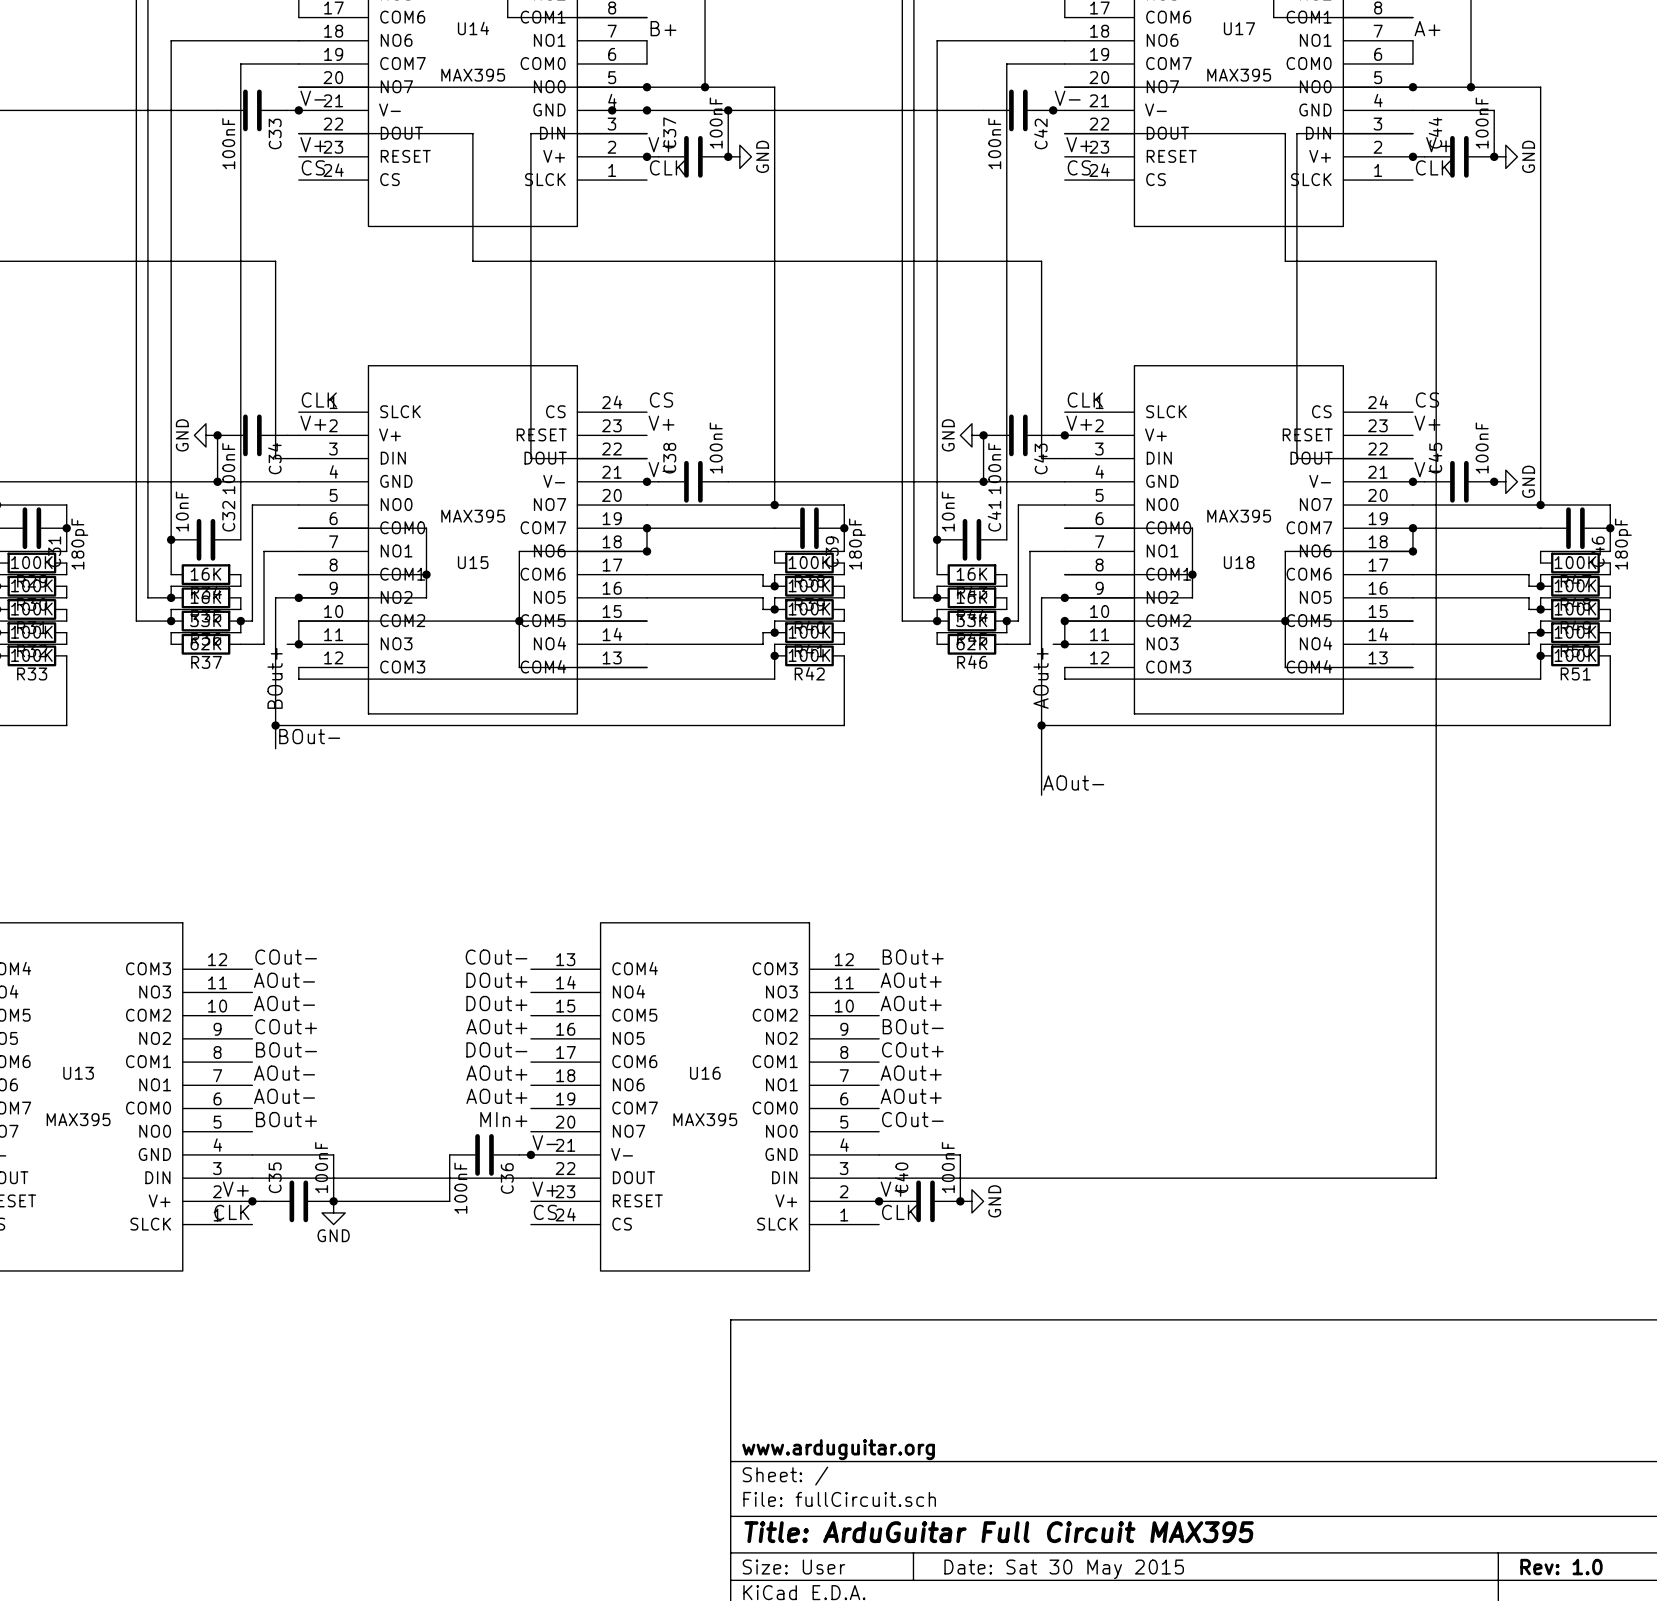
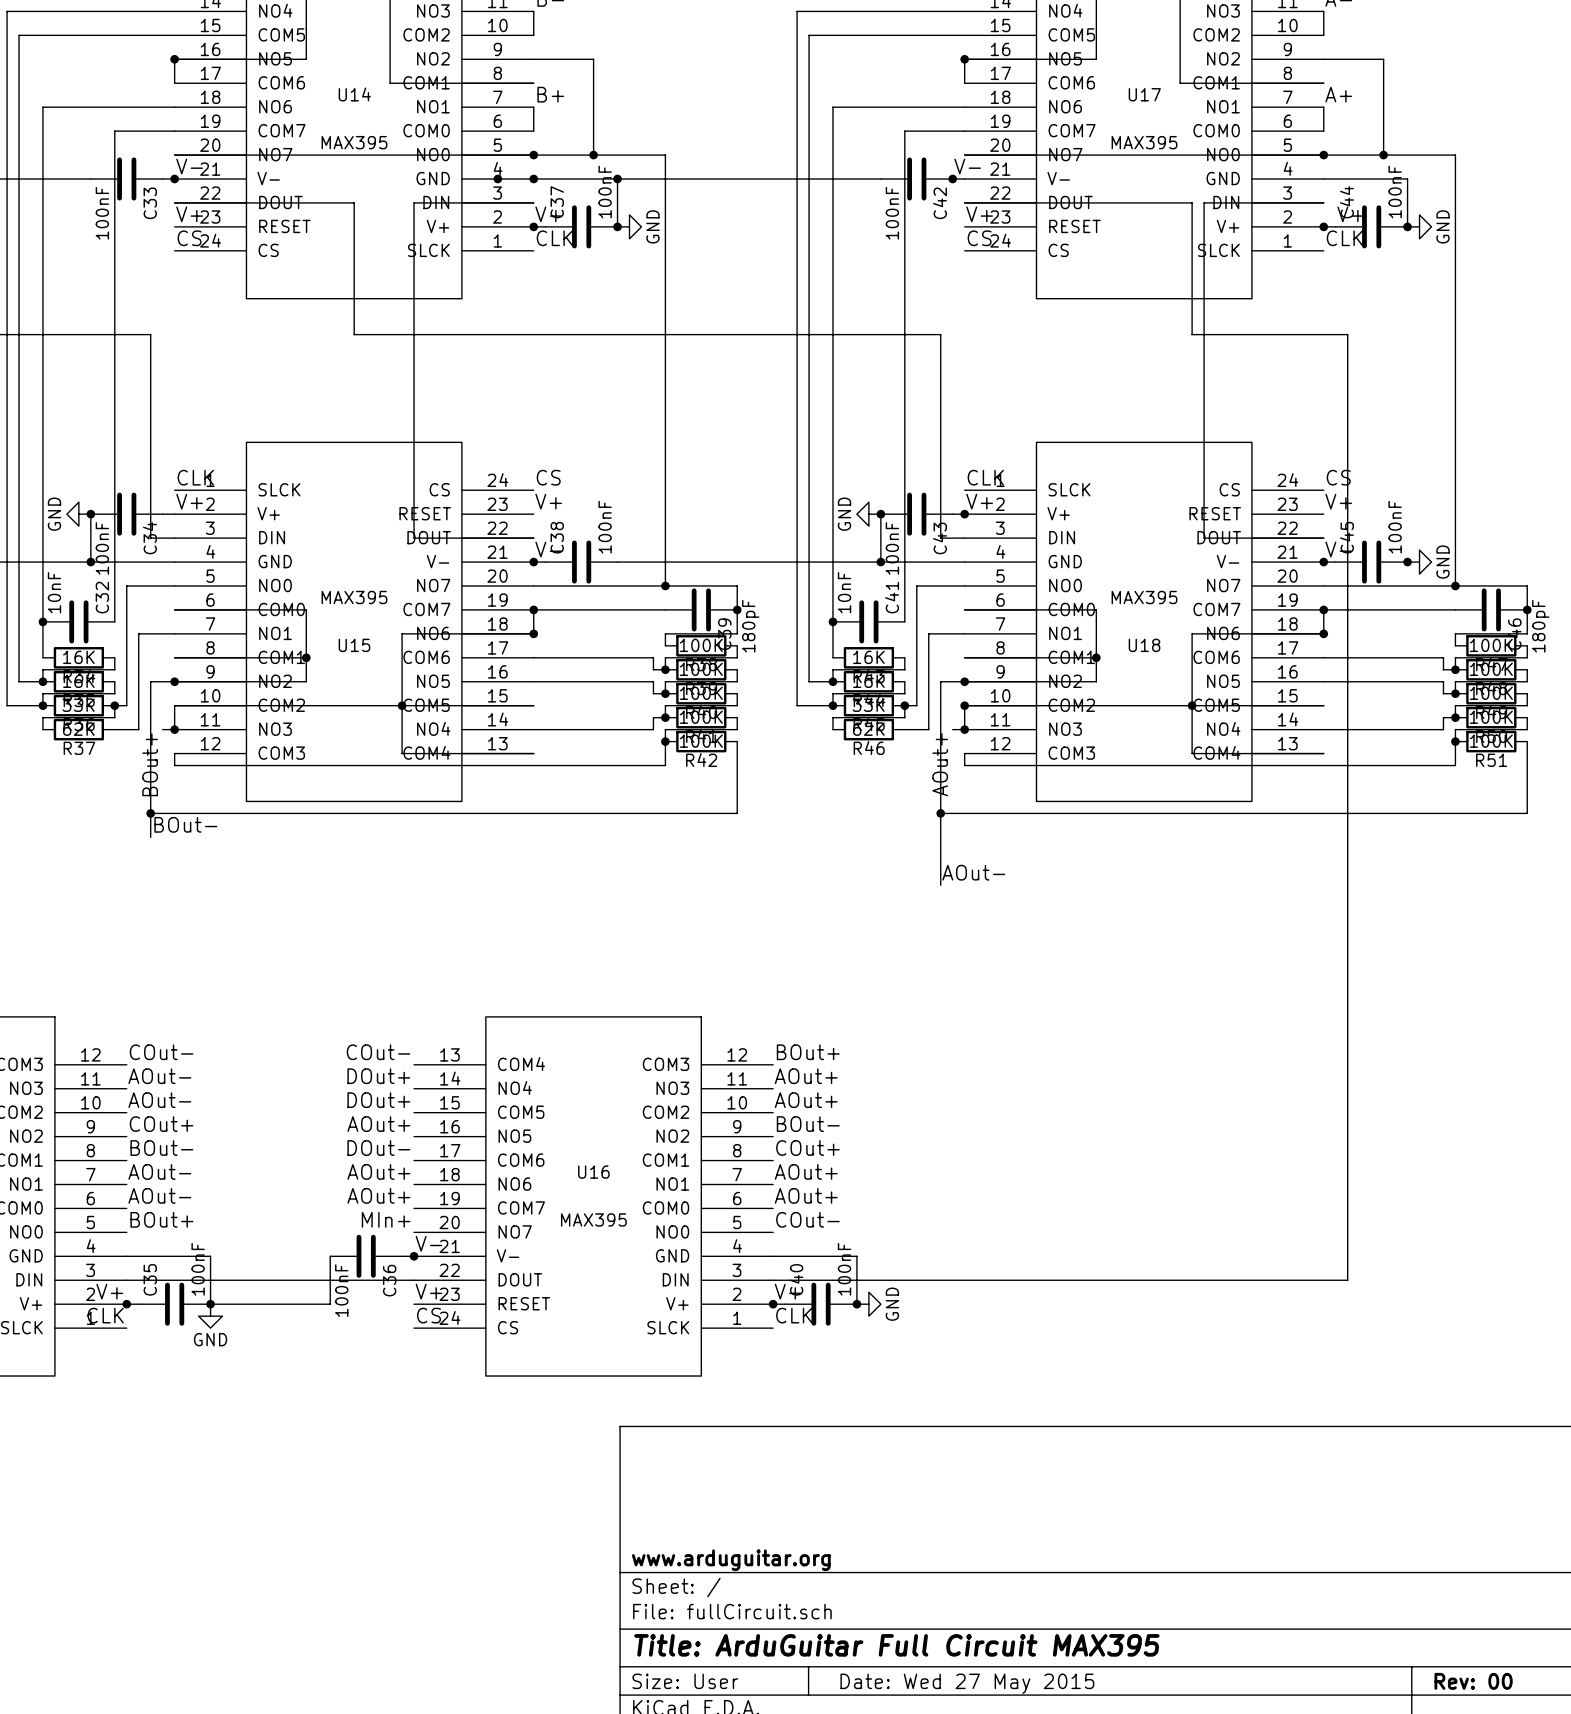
title block: Rev: 1.0 (1561, 1567) -> Rev: 00 (1473, 1681)
title block: Date: Sat 30 May 2015 (1064, 1569) -> Date: Wed 27 May 2015 (967, 1683)

